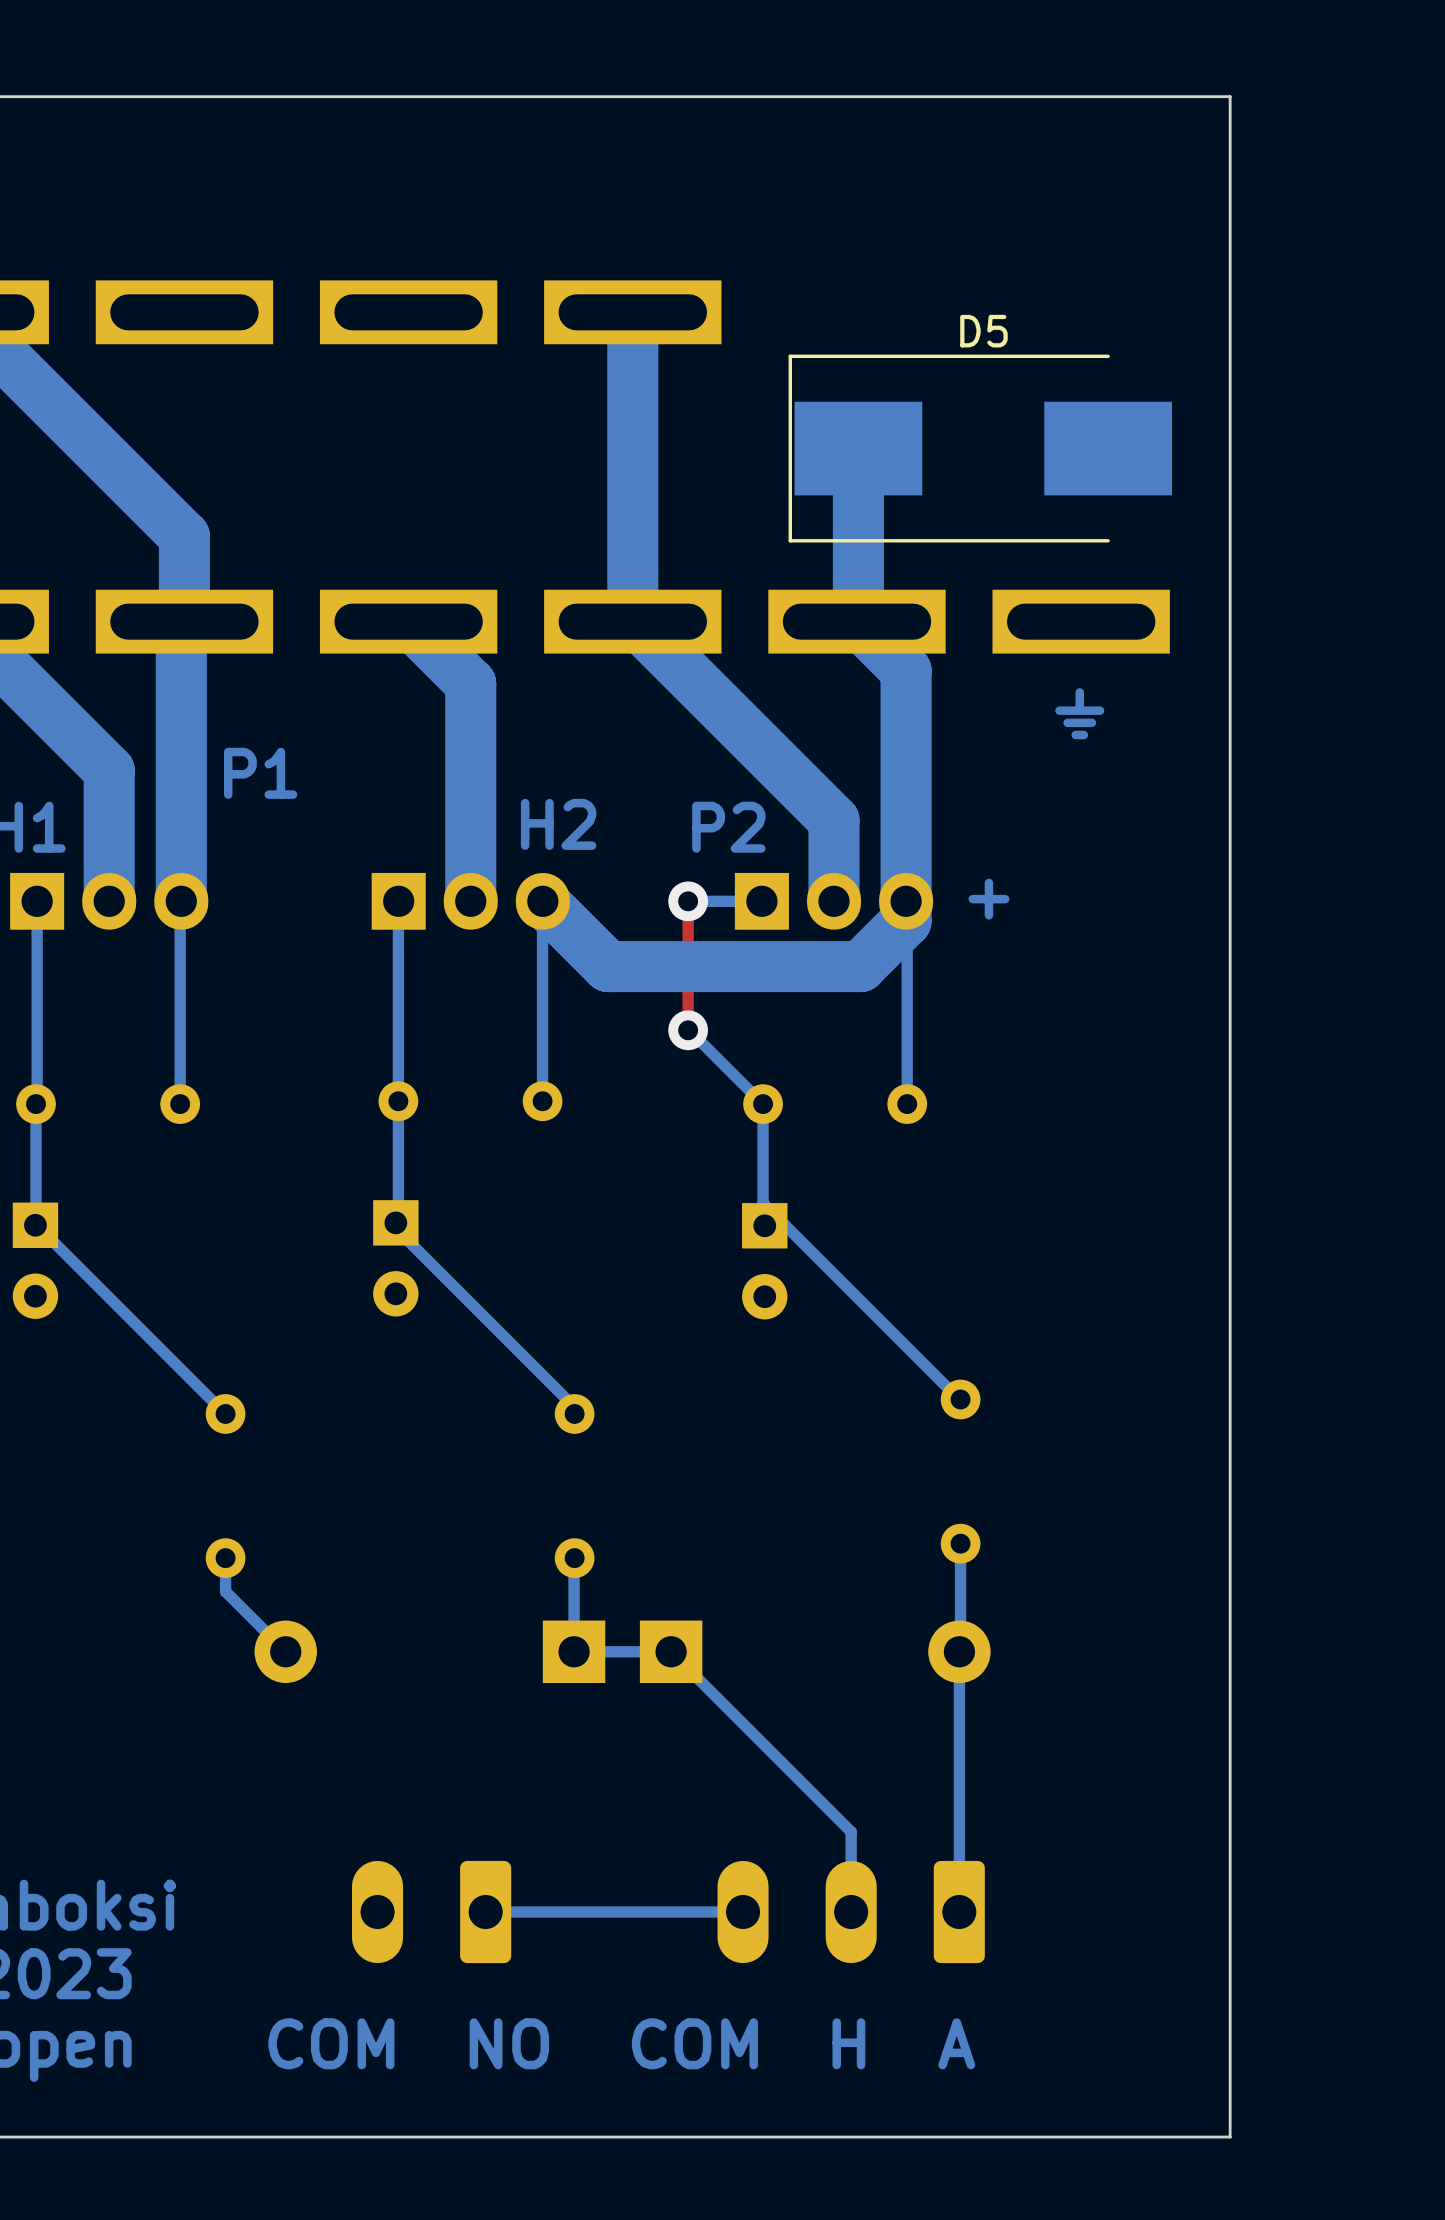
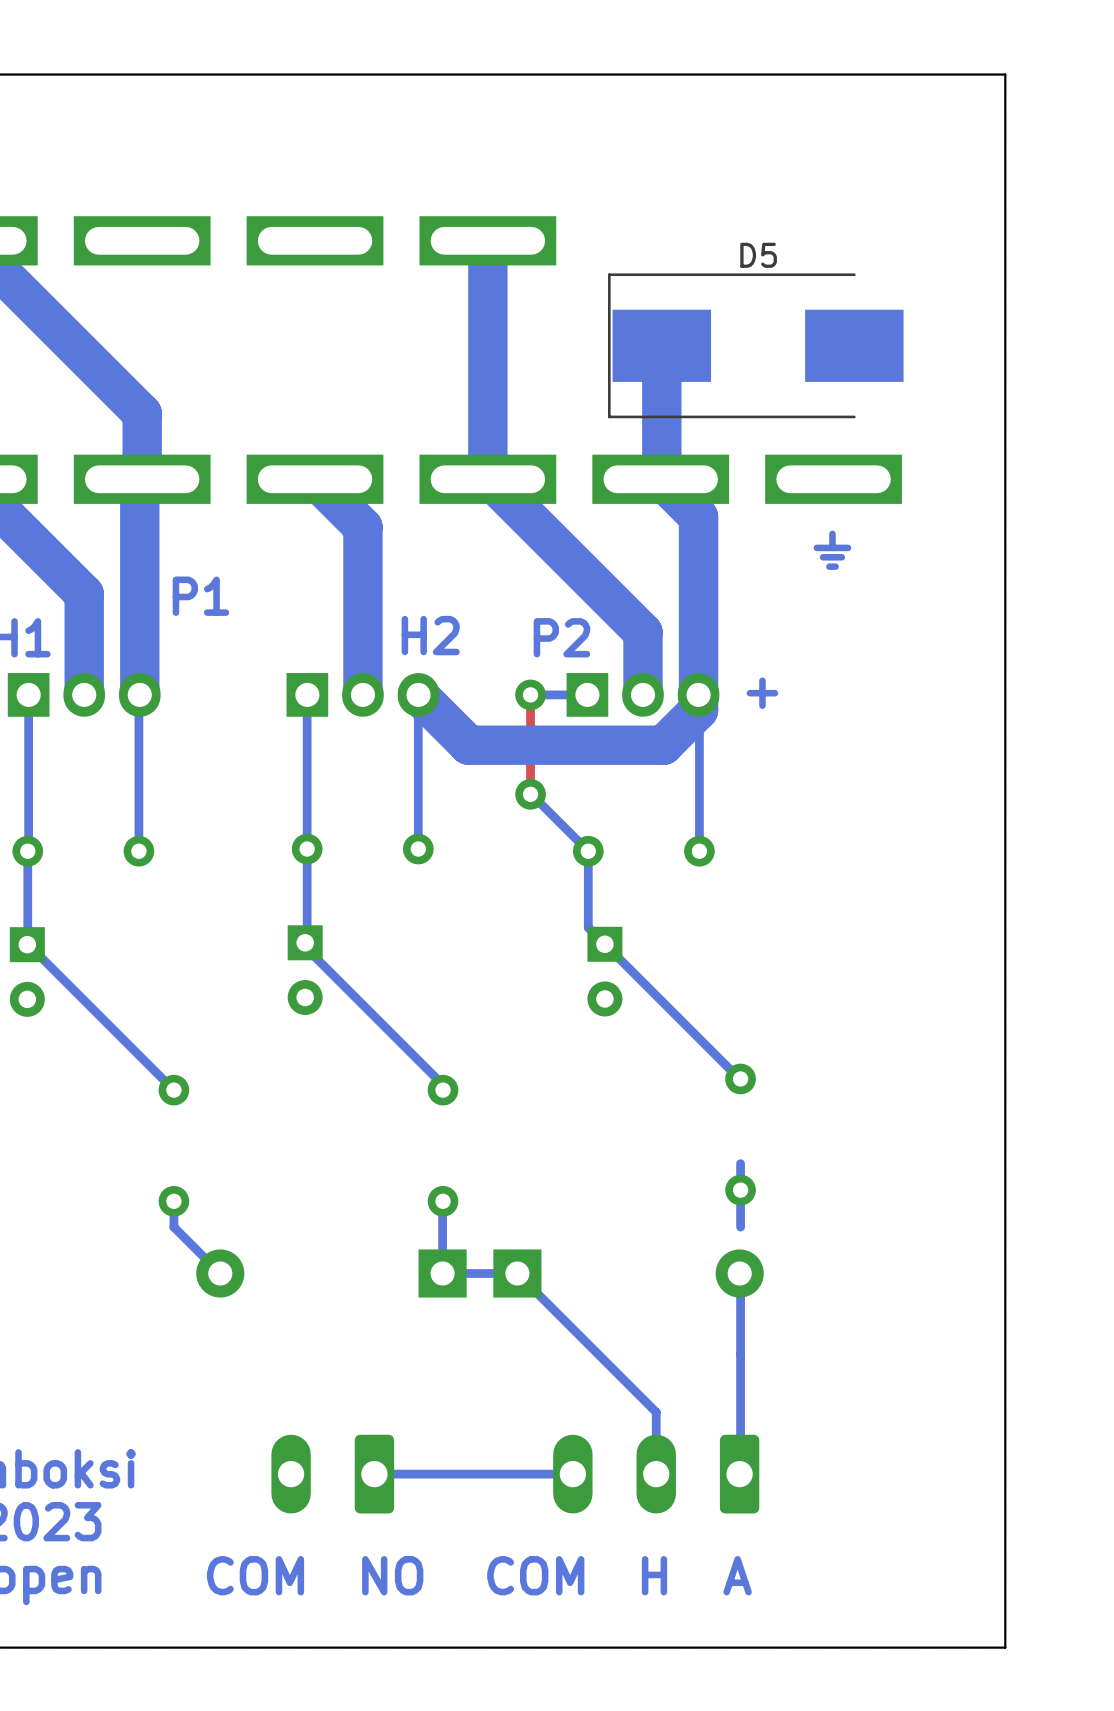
board edge: (1230, 96) (1230, 2137) -> (948, 74) (1005, 74) (1005, 1647) (948, 1647)
part position: (764, 1261) -> (604, 971)
bottom track: none -> (740, 1163) (740, 1190)
bottom track: (960, 1591) (959, 1911) -> (740, 1282) (739, 1474)

